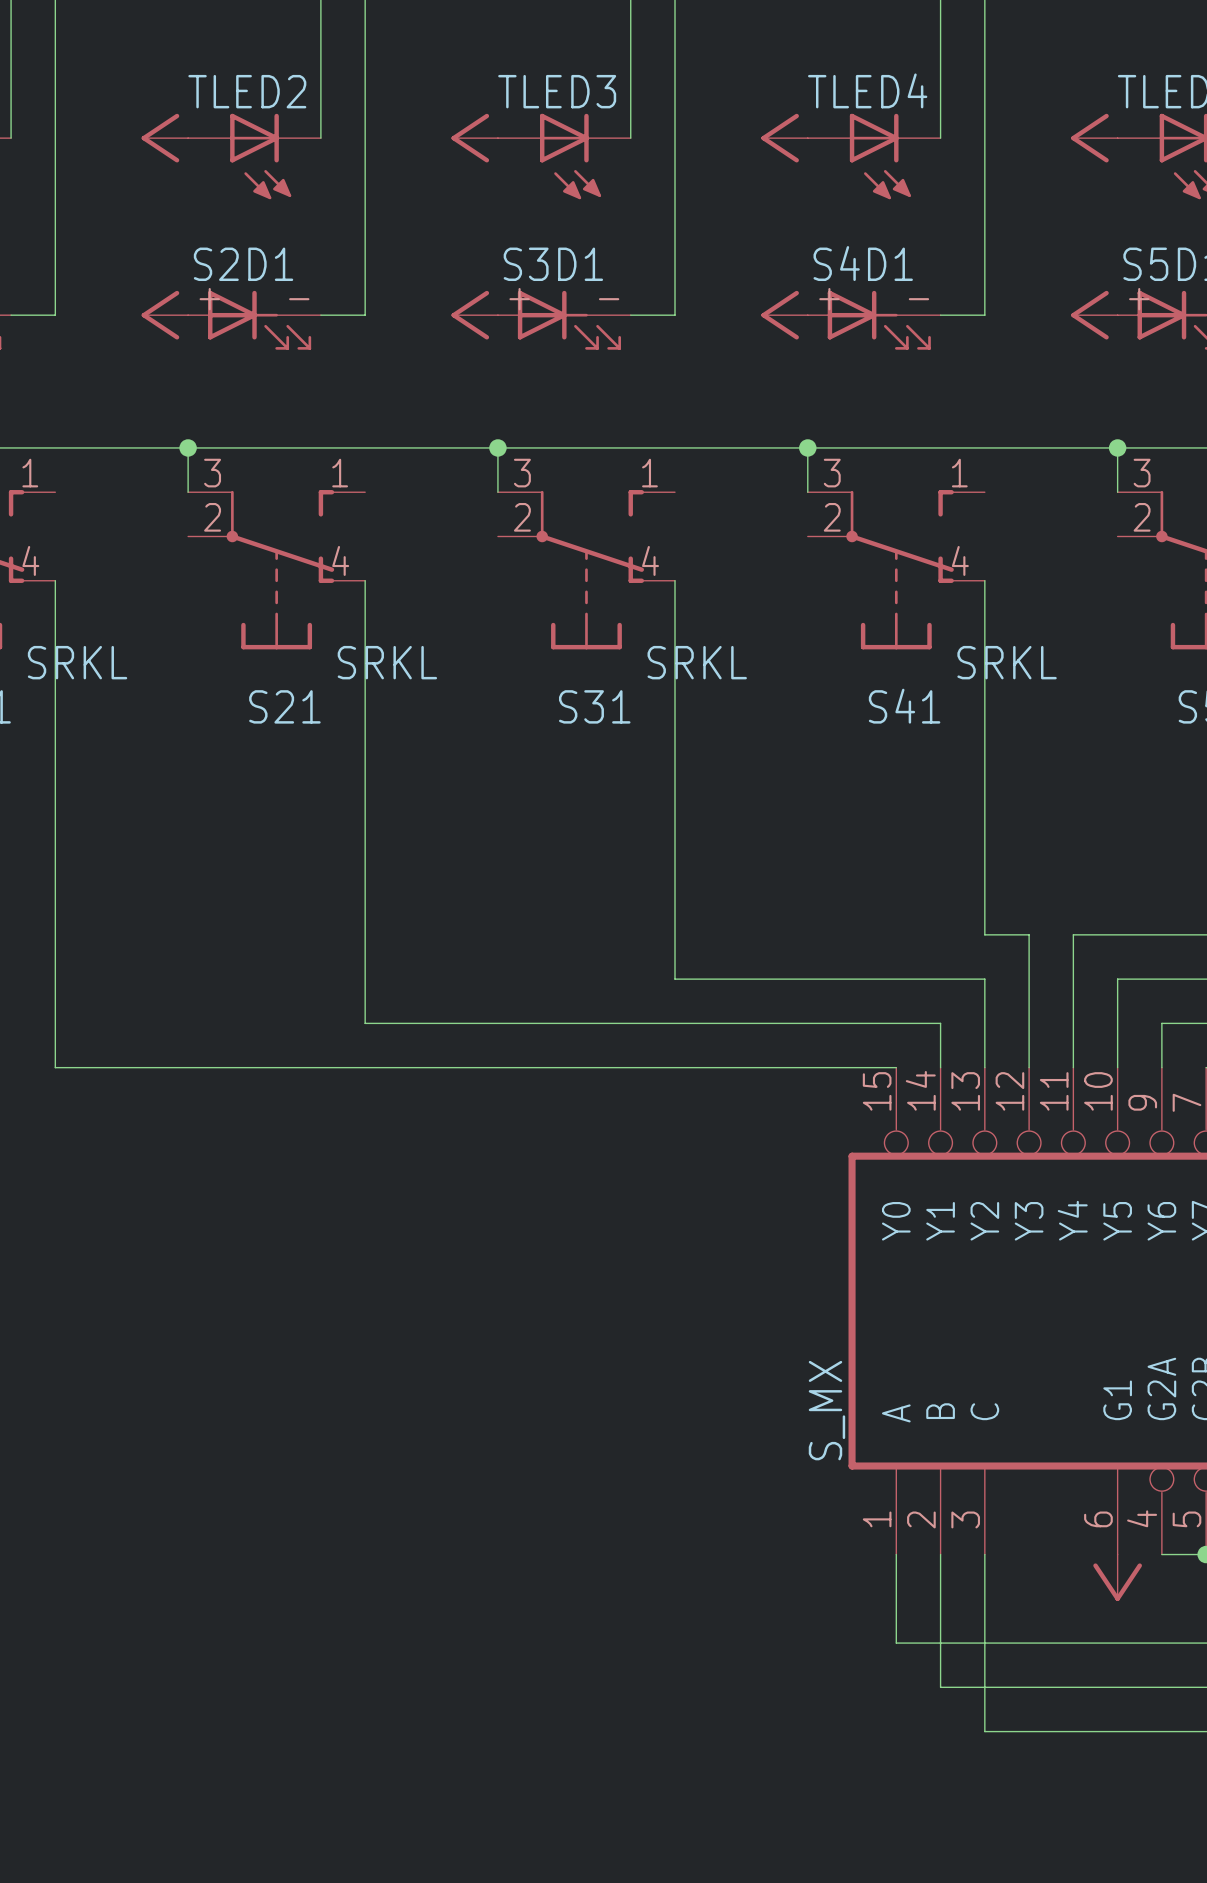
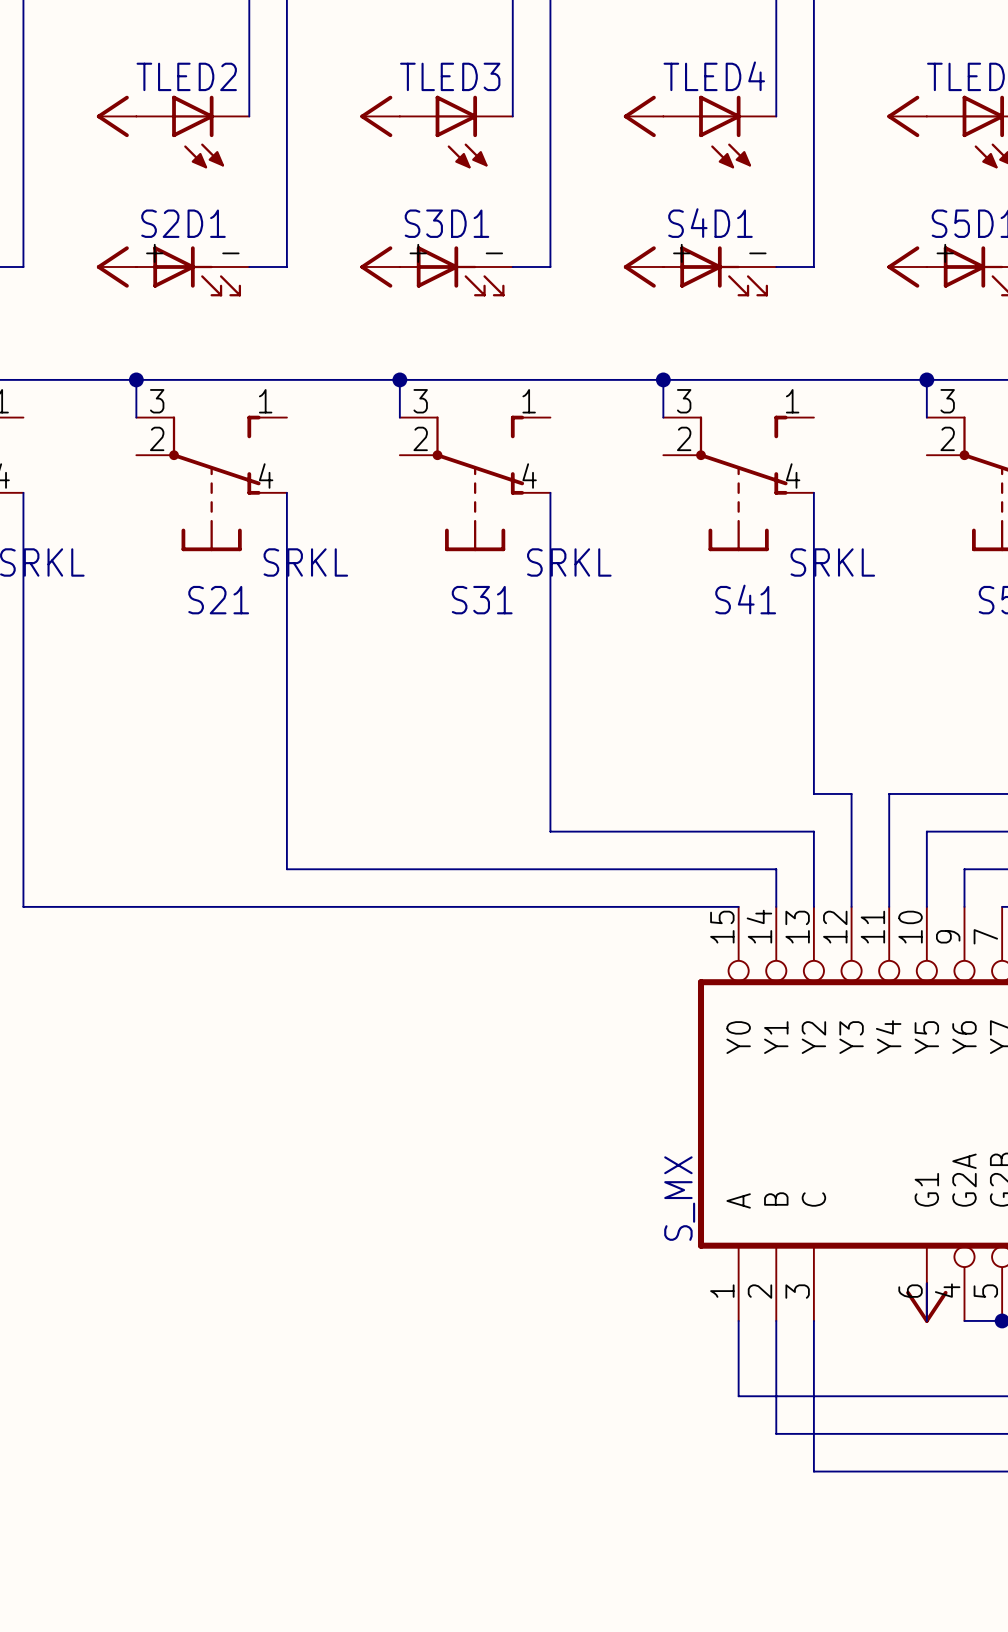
power symbol position: (1117, 1577) -> (926, 1303)

